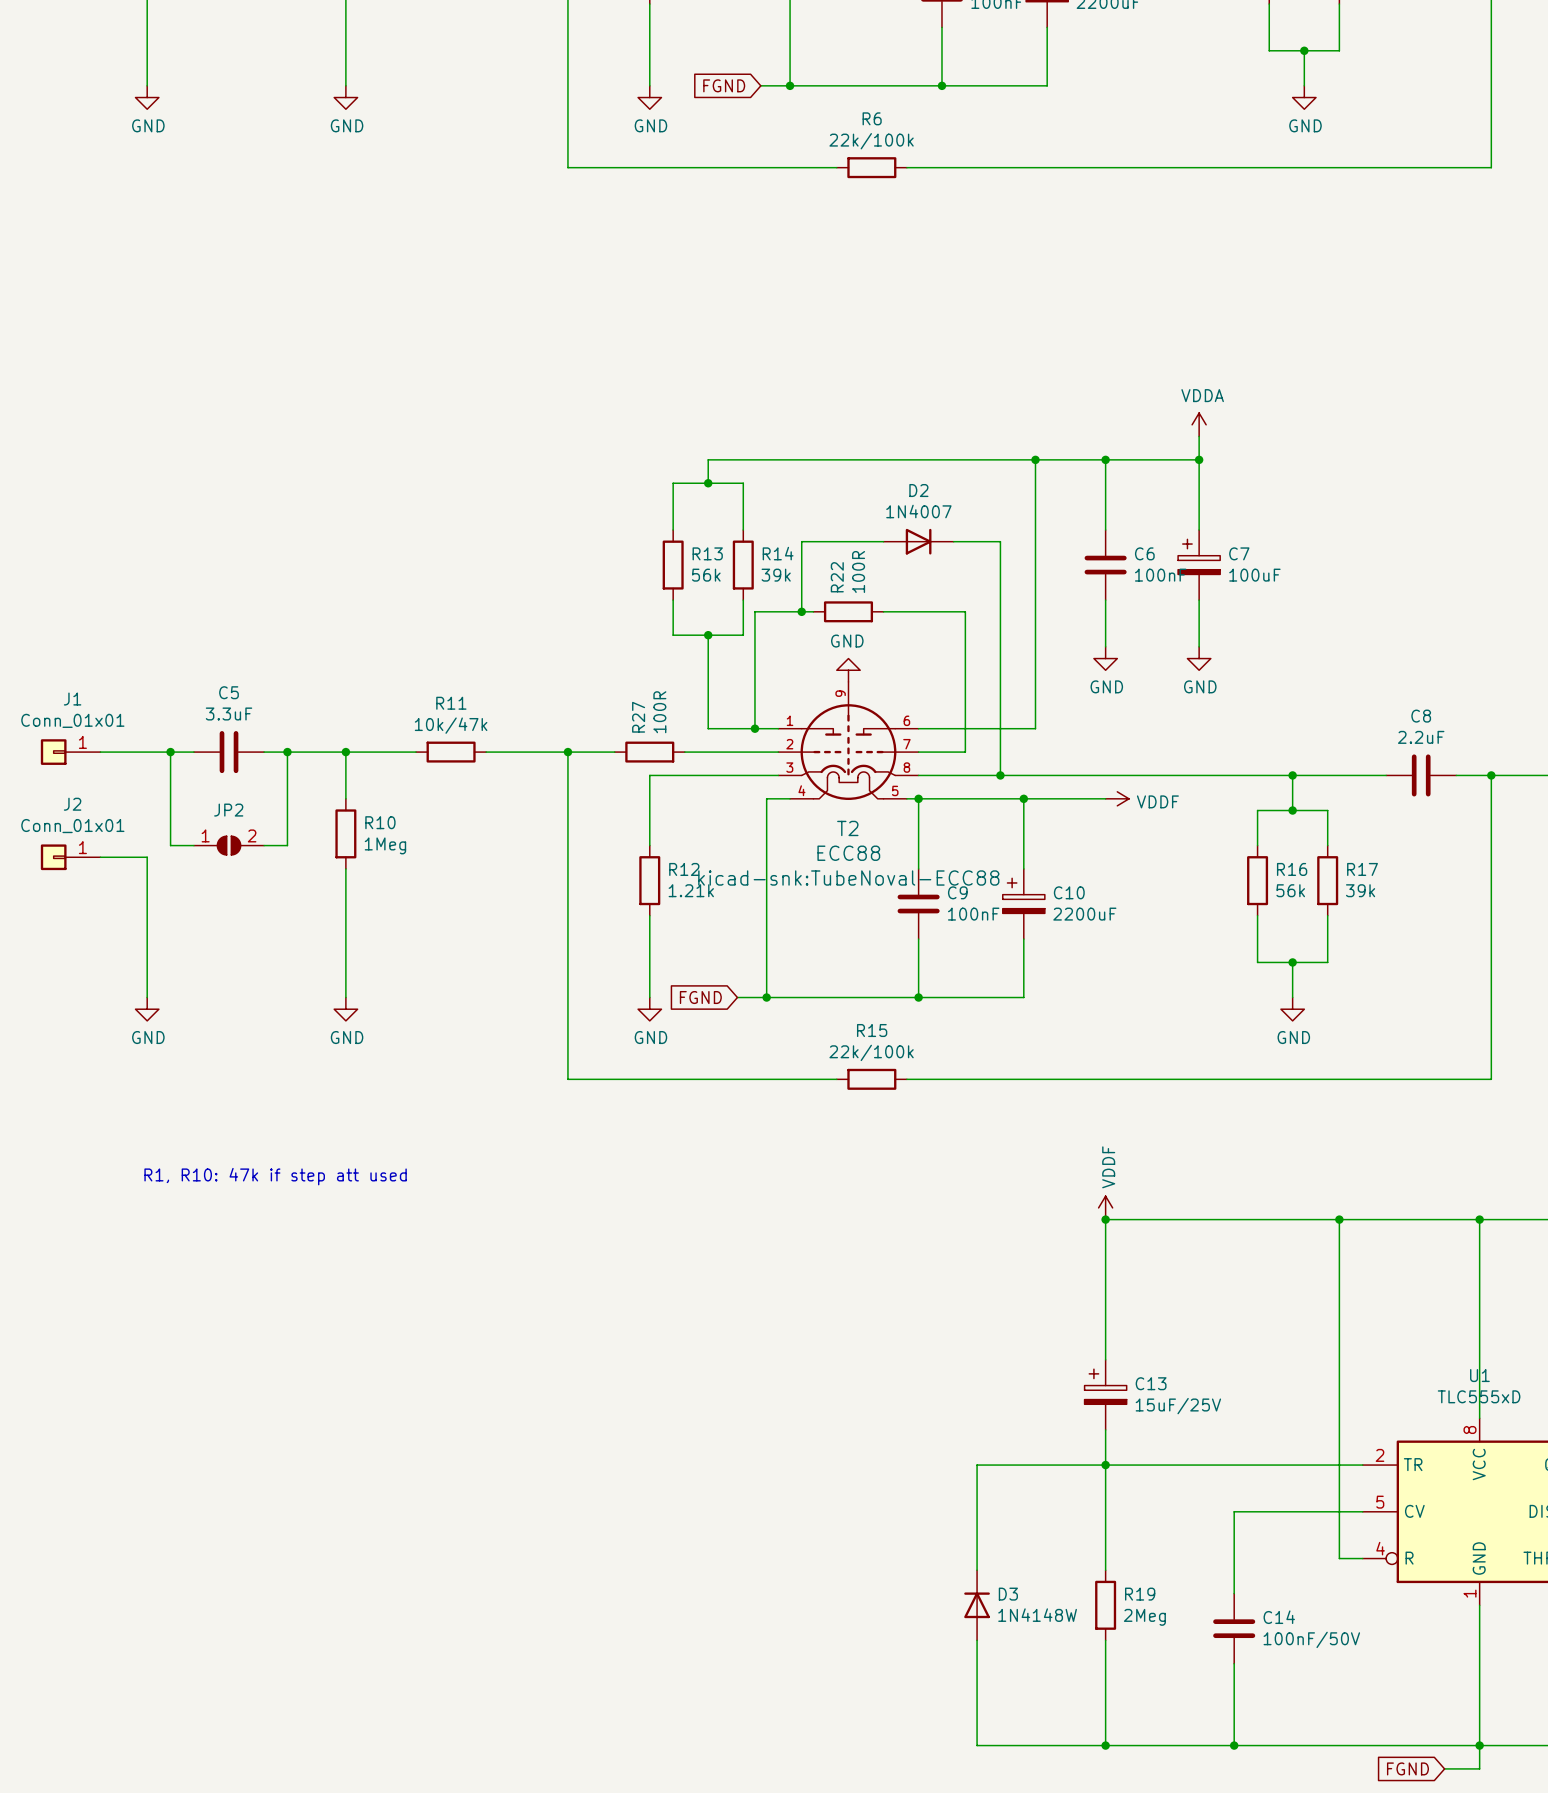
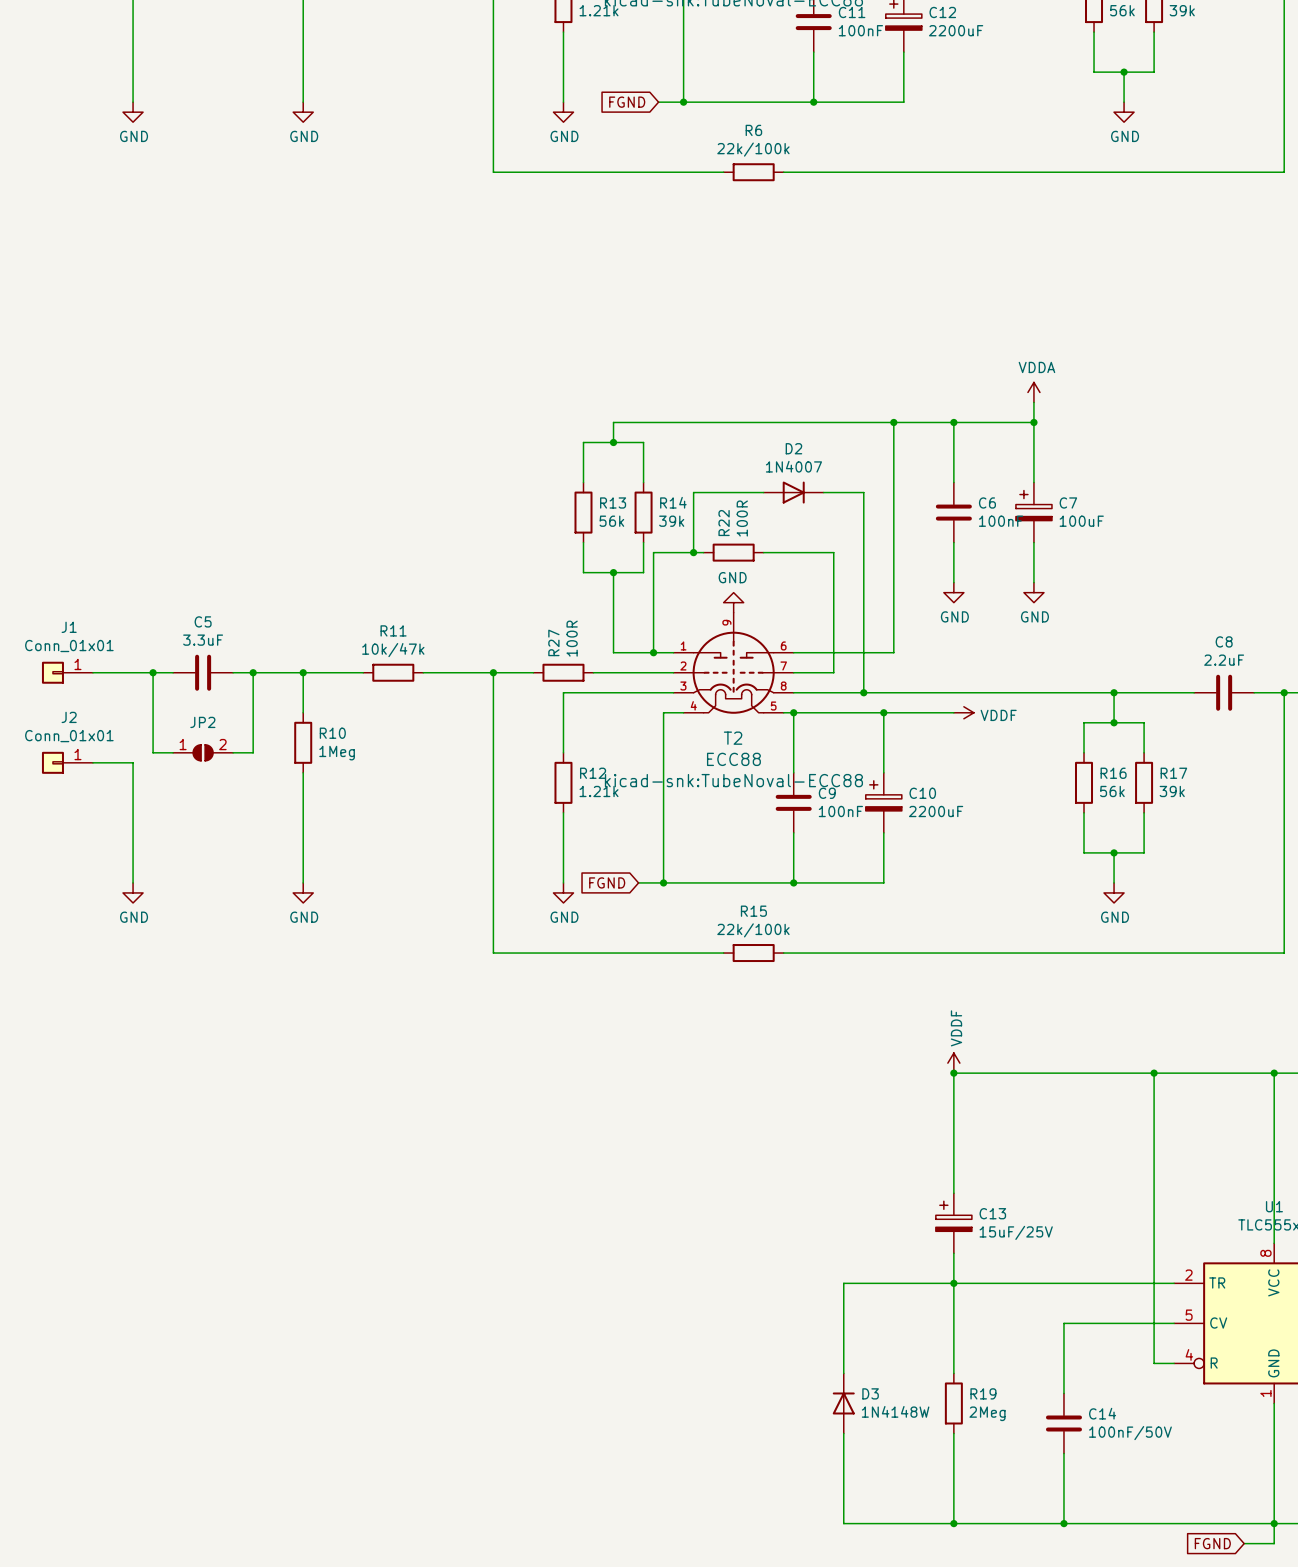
text: R1, R10: 47k if step att used (275, 1176) -> none

